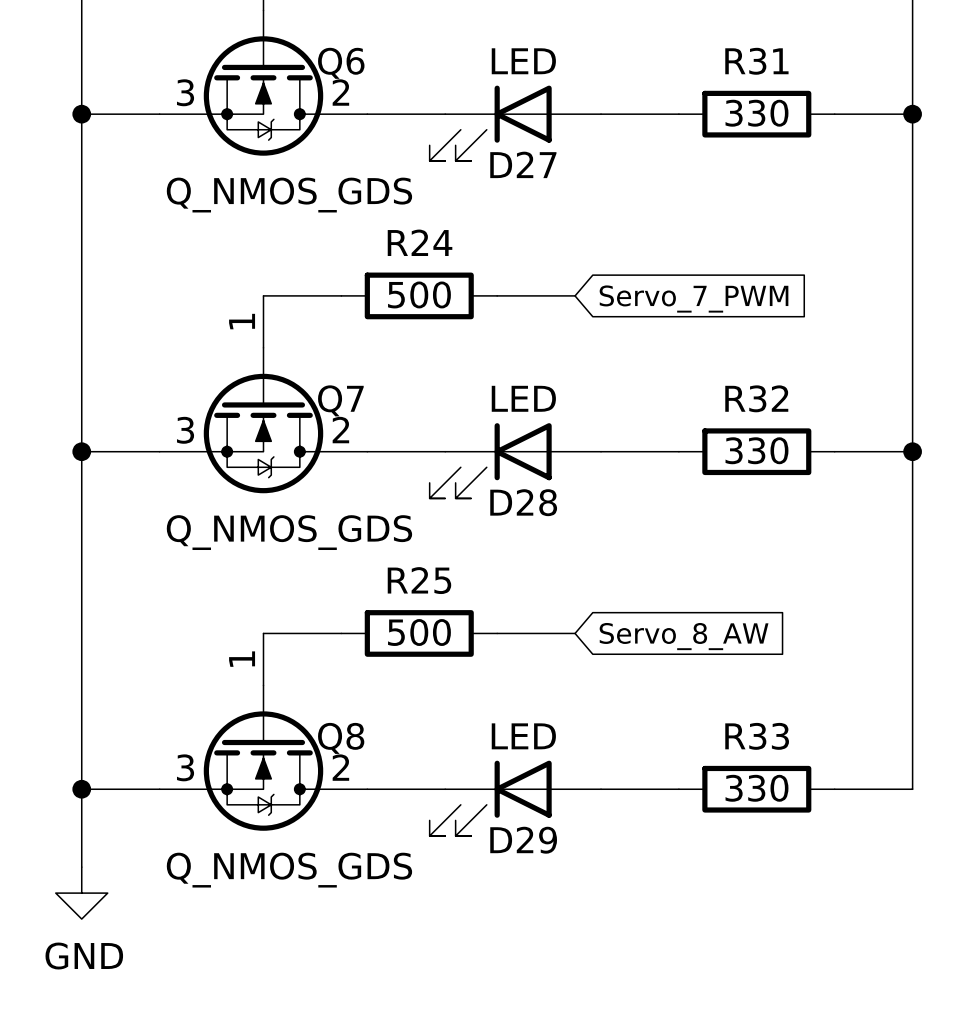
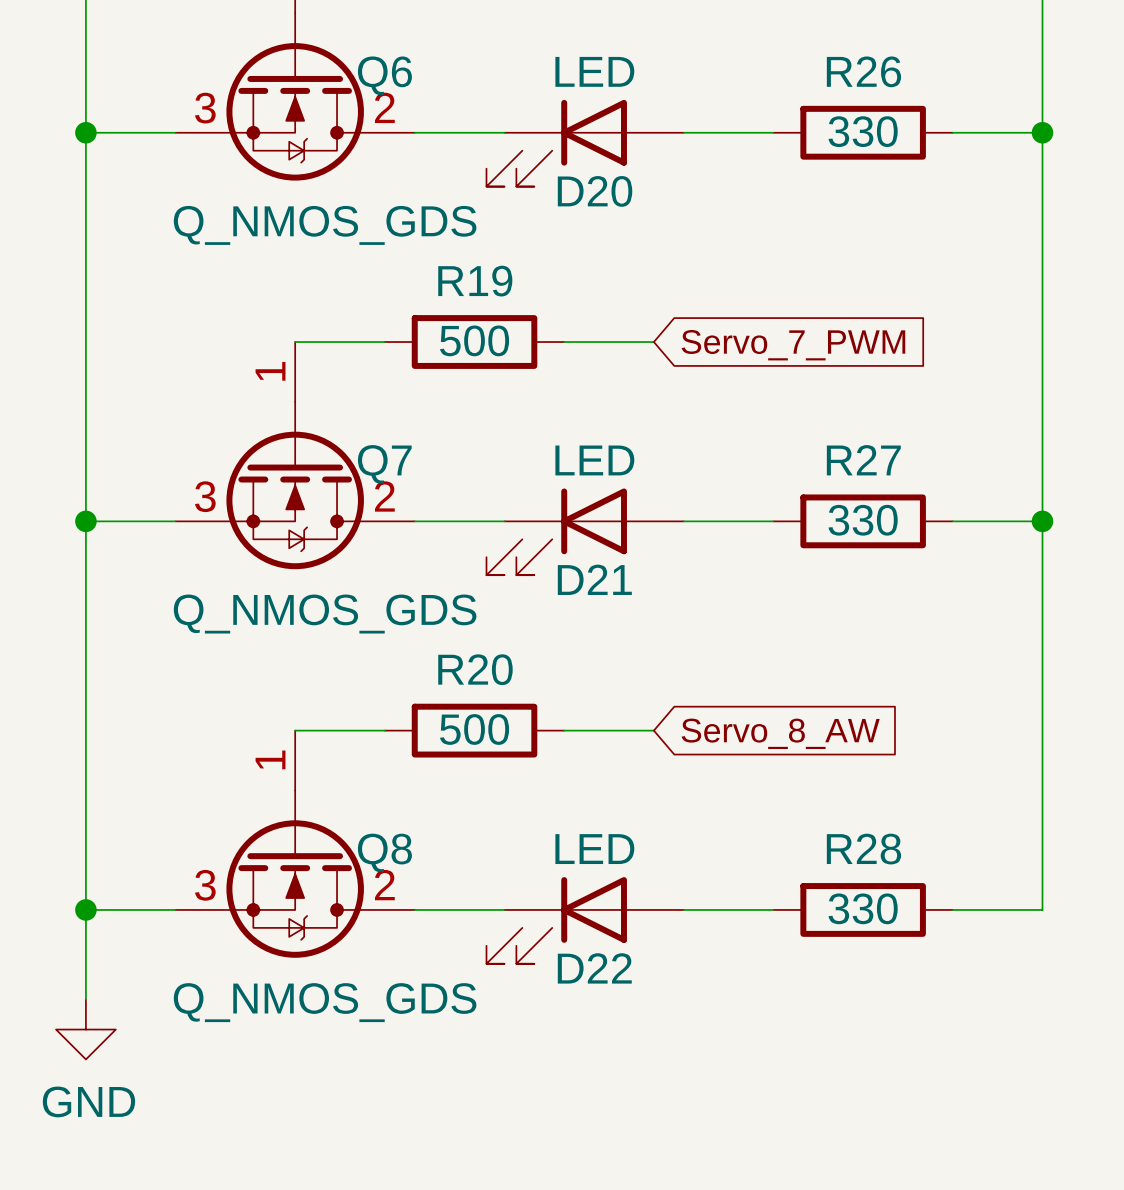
R31 name: R31 (756, 61) -> R26 (863, 71)
D27 name: D27 (523, 164) -> D20 (595, 191)
R24 name: R24 (420, 242) -> R19 (475, 281)
R32 name: R32 (756, 398) -> R27 (863, 460)
D28 name: D28 (523, 502) -> D21 (594, 579)
R25 name: R25 (419, 580) -> R20 (475, 669)
R33 name: R33 (757, 736) -> R28 (863, 849)
D29 name: D29 (523, 840) -> D22 (594, 968)

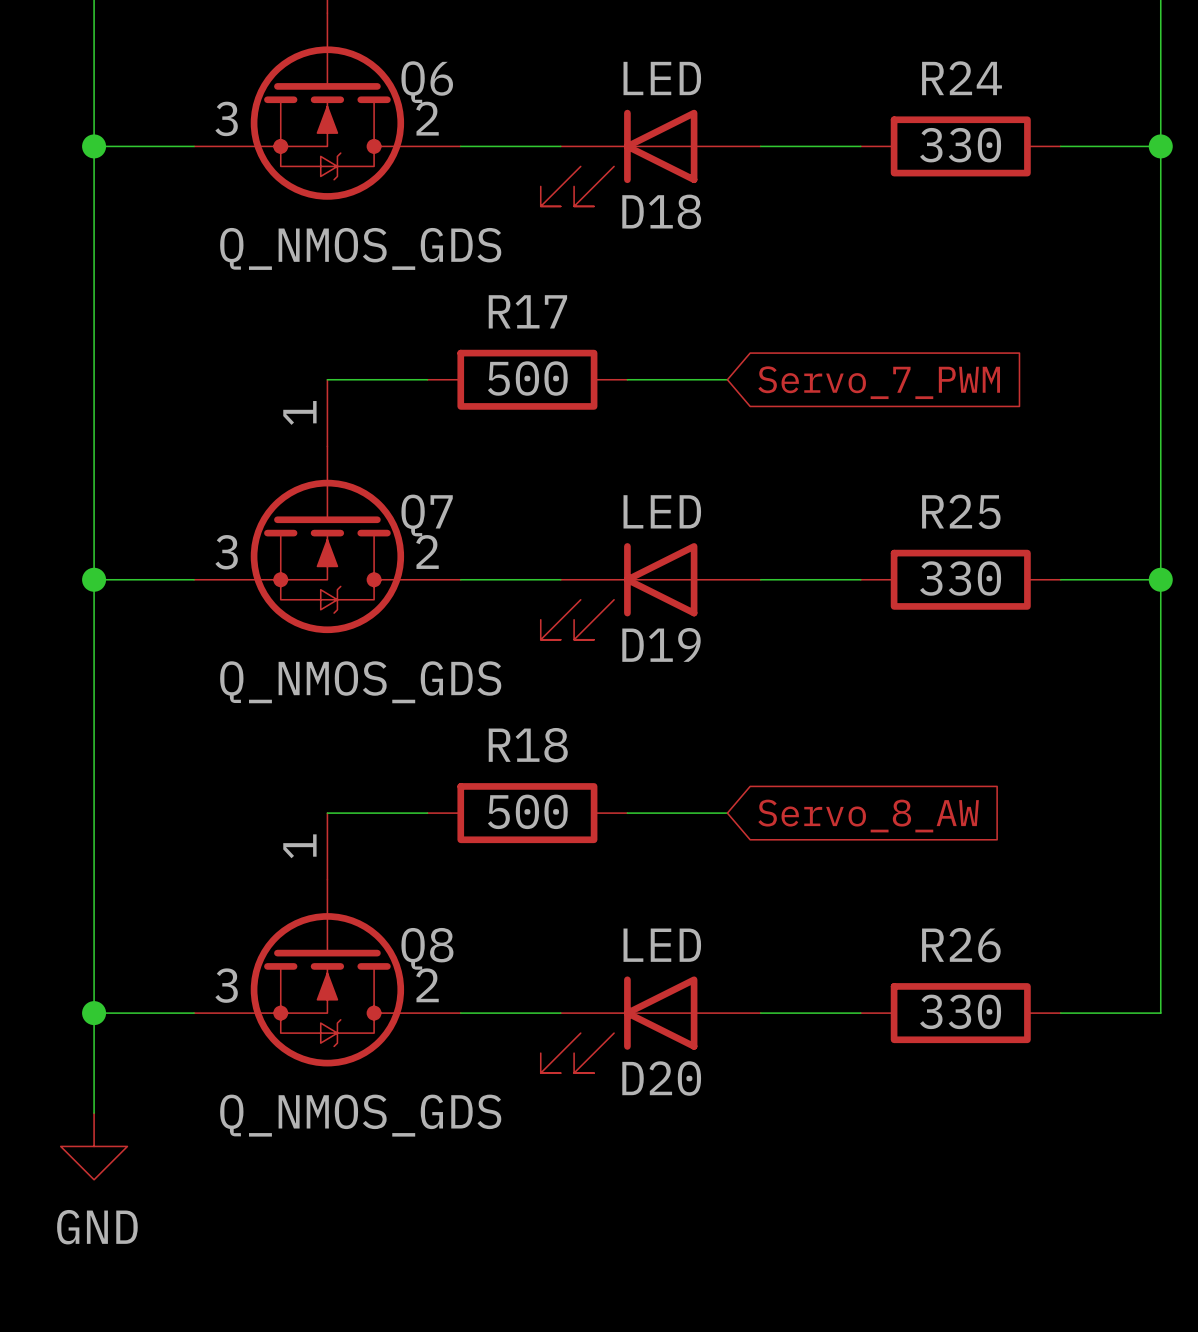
R26 name: R26 (863, 71) -> R24 (962, 78)
D20 name: D20 (595, 191) -> D18 (661, 211)
R19 name: R19 (475, 281) -> R17 (527, 311)
R27 name: R27 (863, 460) -> R25 (961, 511)
D21 name: D21 (594, 579) -> D19 (661, 644)
R20 name: R20 (475, 669) -> R18 (528, 745)
R28 name: R28 (863, 849) -> R26 (961, 945)
D22 name: D22 (594, 968) -> D20 (661, 1078)

